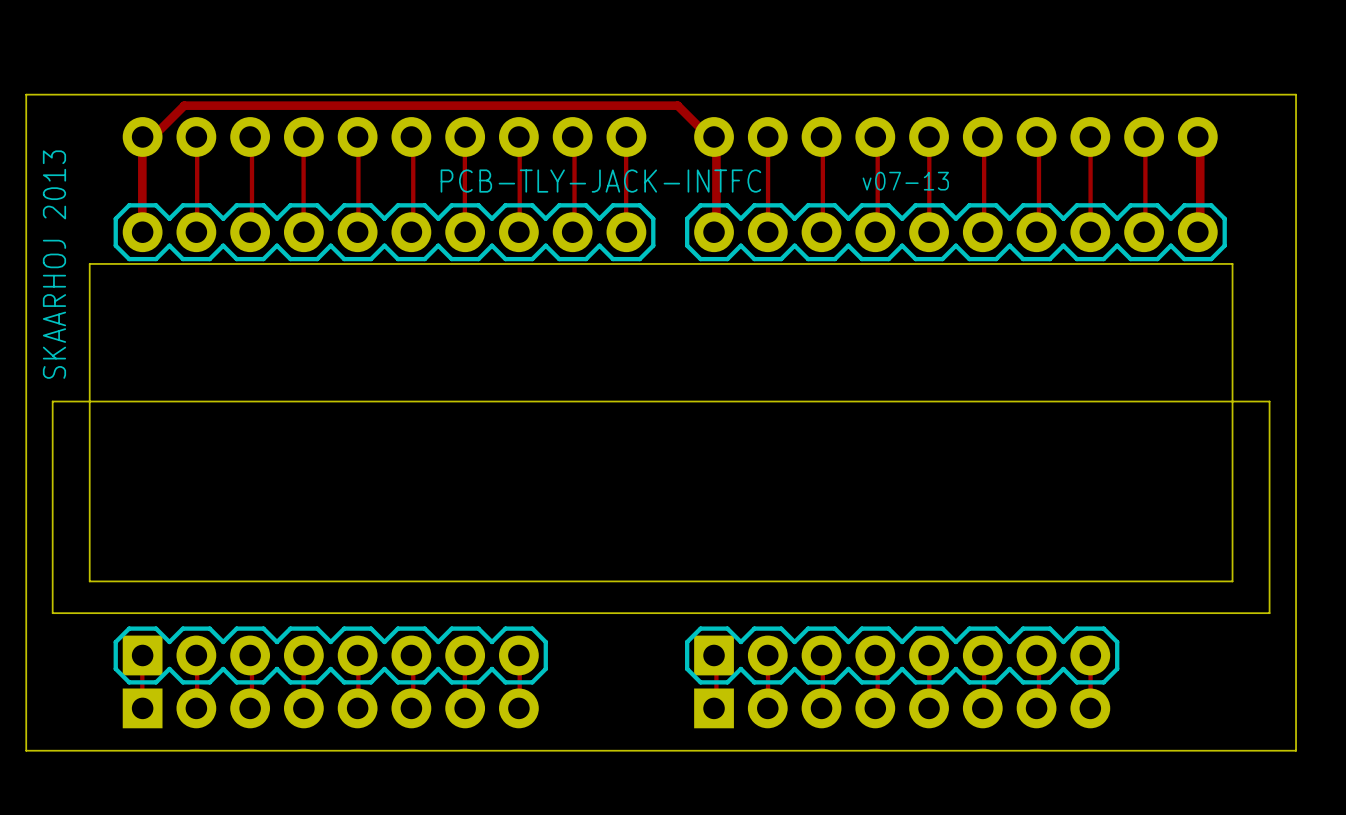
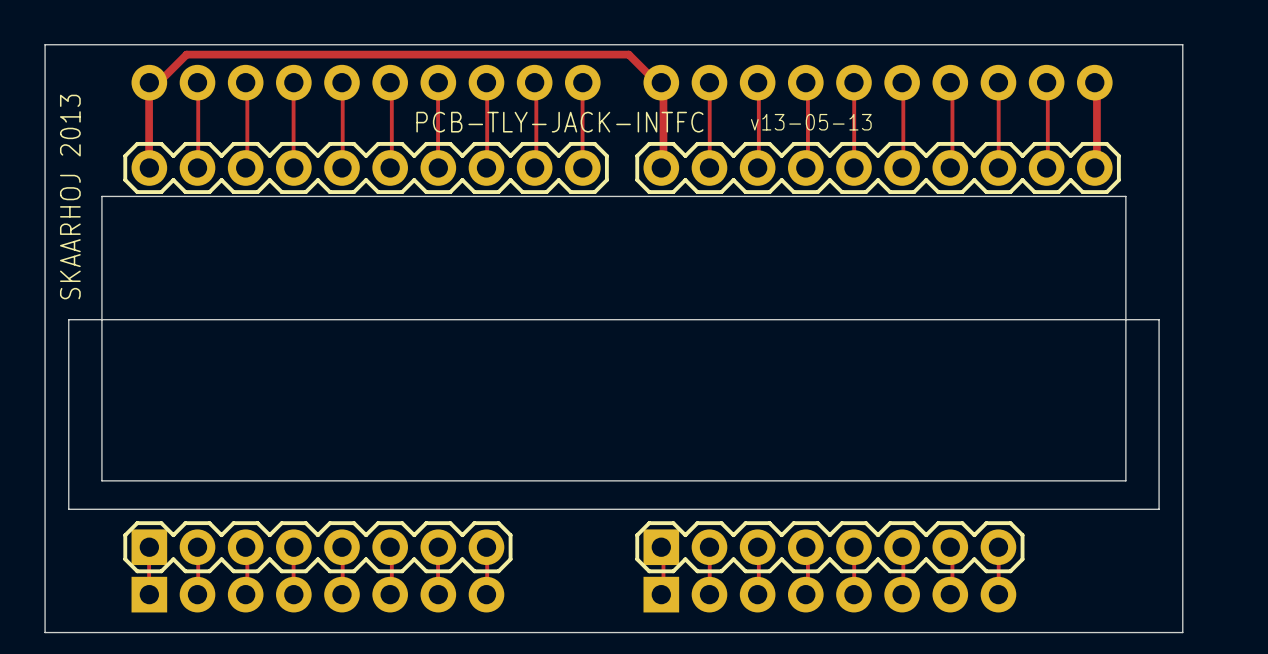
text: v07-13 (905, 181) -> v13-05-13 (811, 122)

